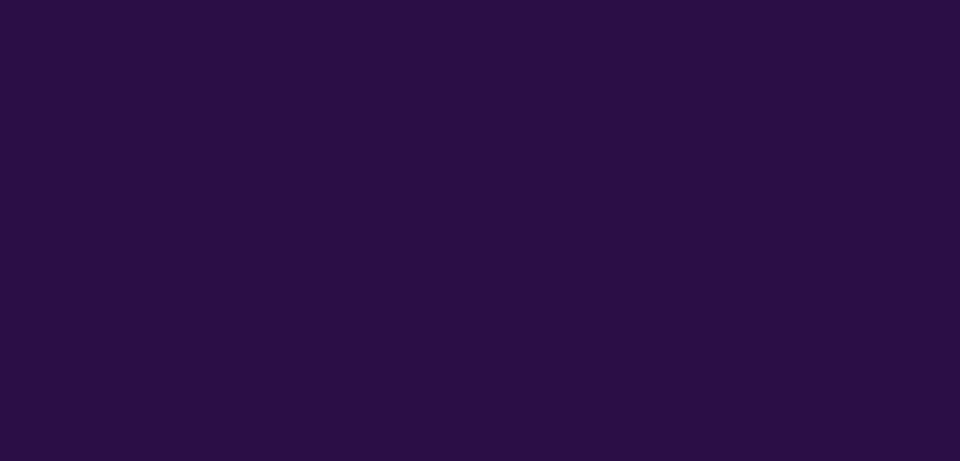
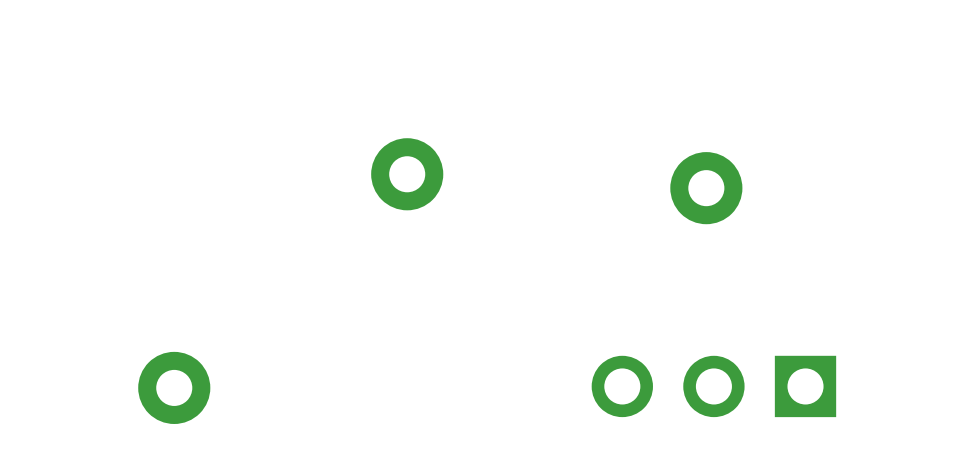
part: none -> (407, 174)
part: none -> (706, 188)
part: none -> (713, 386)
part: none -> (174, 387)

